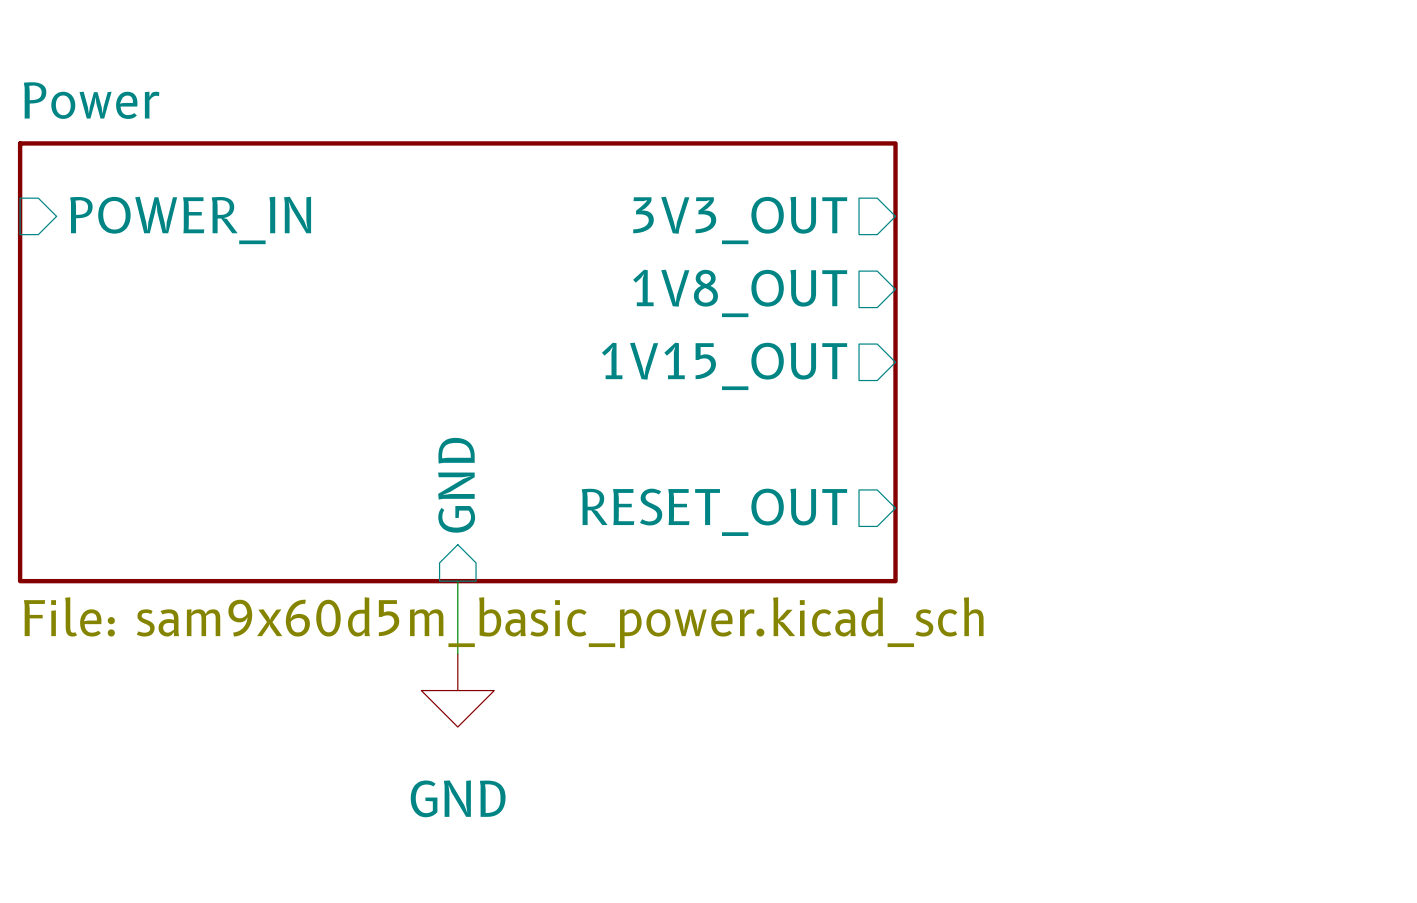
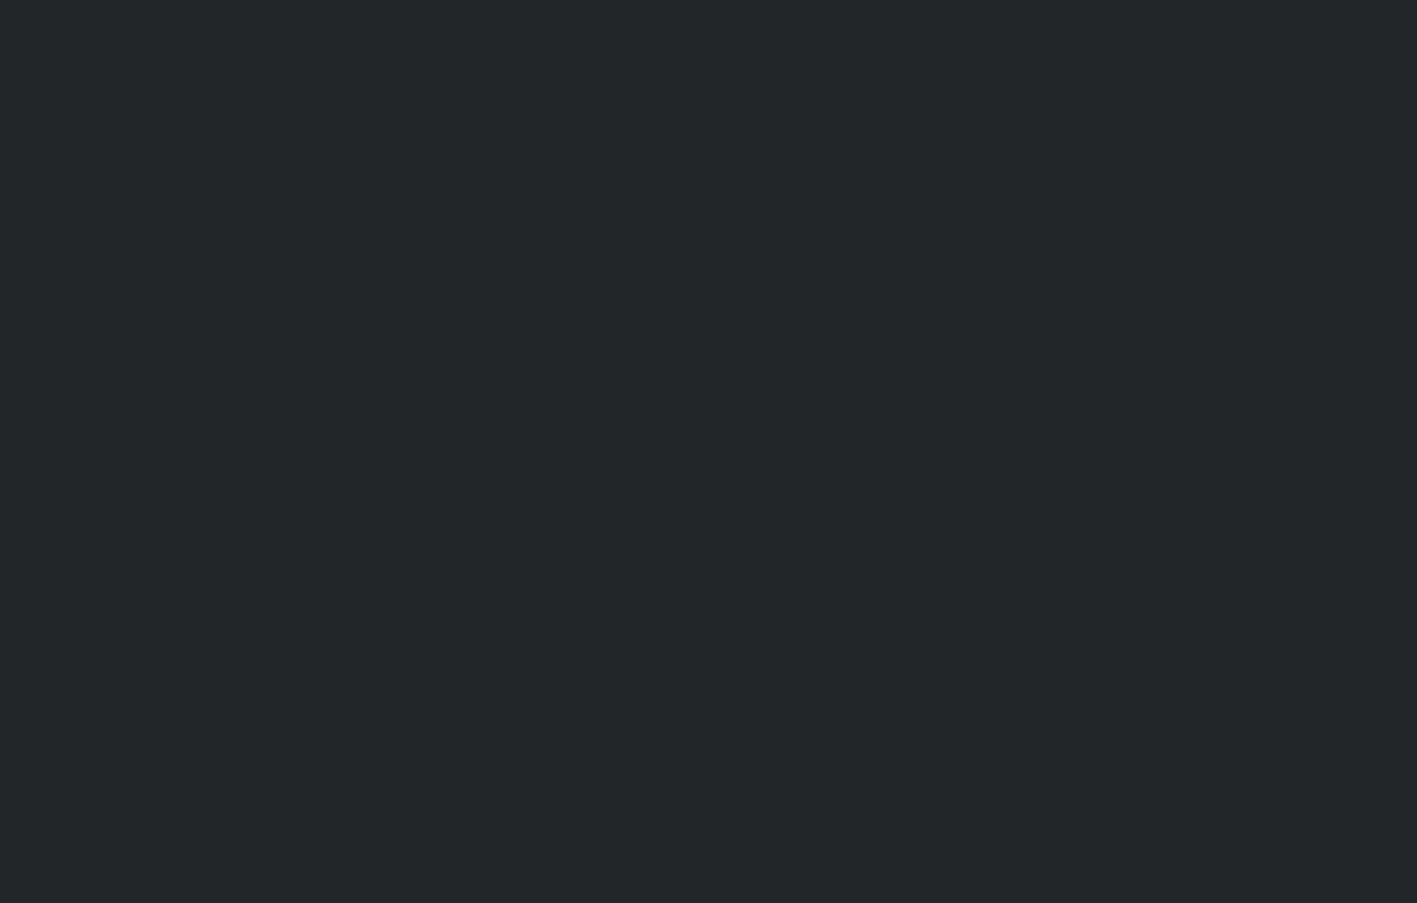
sheet pin: POWER_IN (190, 220) -> none
sheet pin: 3V3_OUT (740, 220) -> none
sheet pin: 1V8_OUT (740, 293) -> none
sheet Power: File: sam9x60d5m_basic_power.kicad_sch (457, 362) -> none
sheet pin: 1V15_OUT (724, 366) -> none
sheet pin: GND (456, 485) -> none
sheet pin: RESET_OUT (714, 512) -> none
wire: (457, 581) (457, 654) -> none
power symbol: GND (457, 690) -> none

